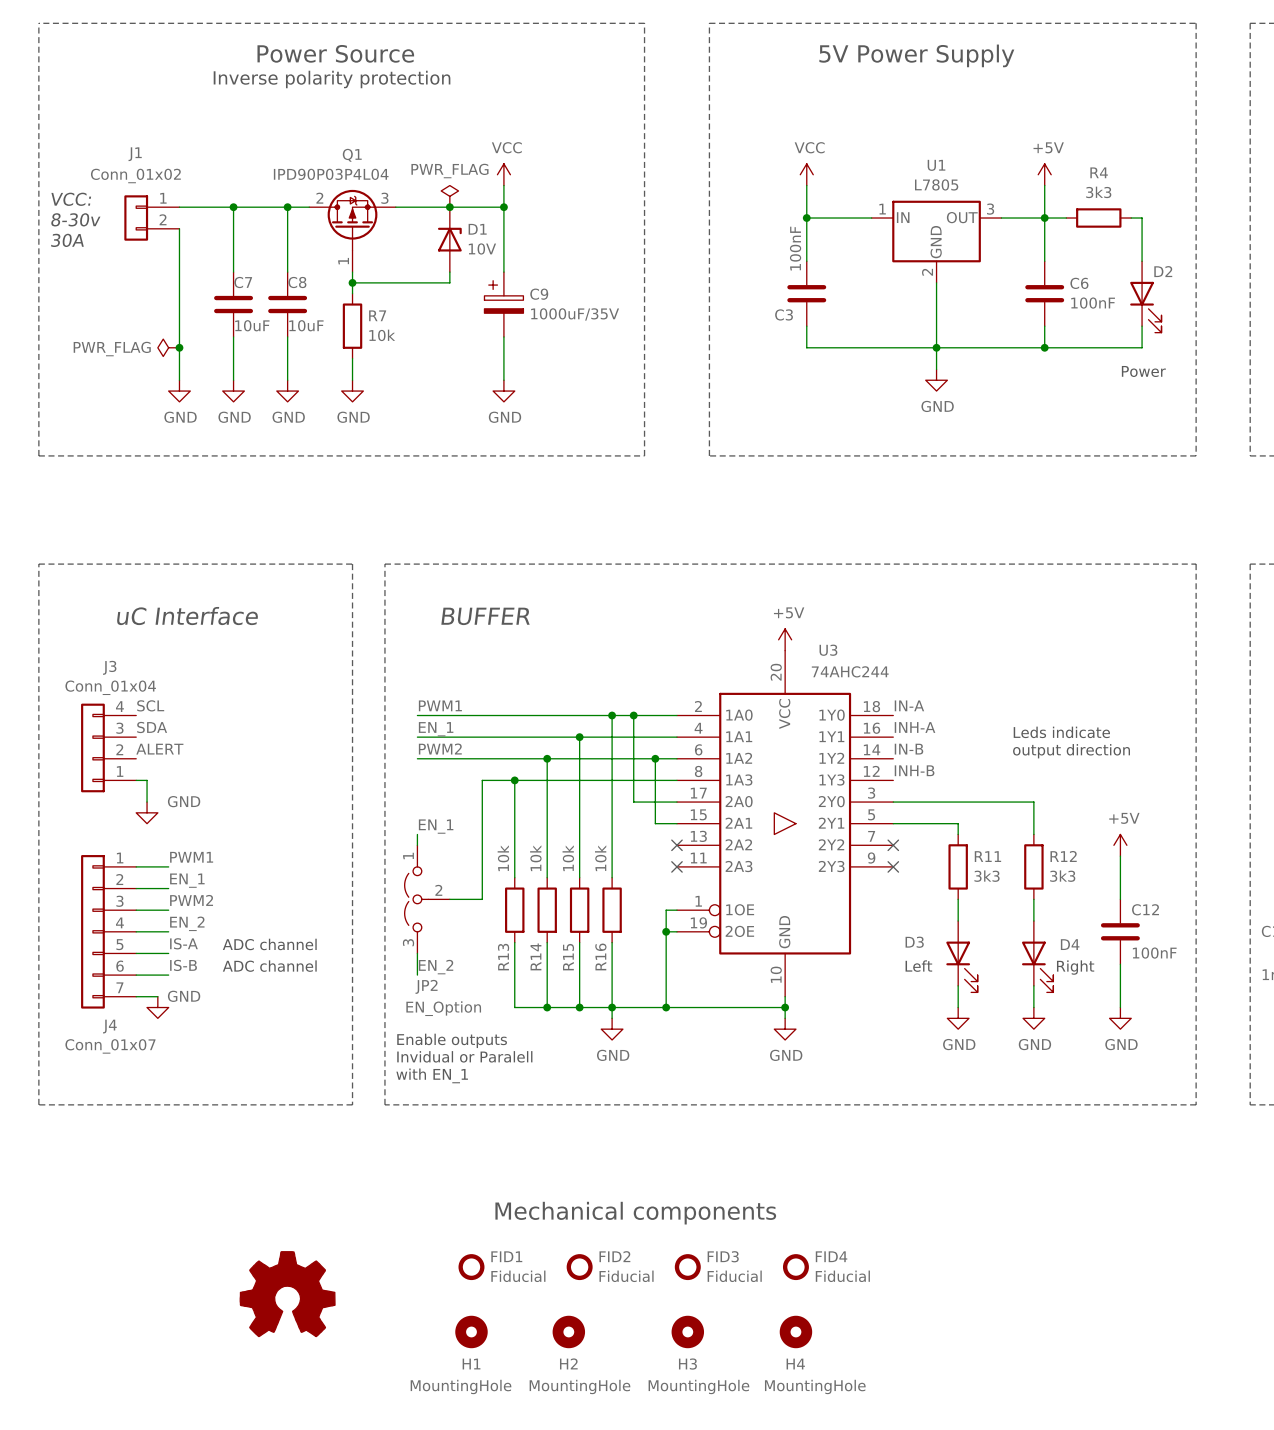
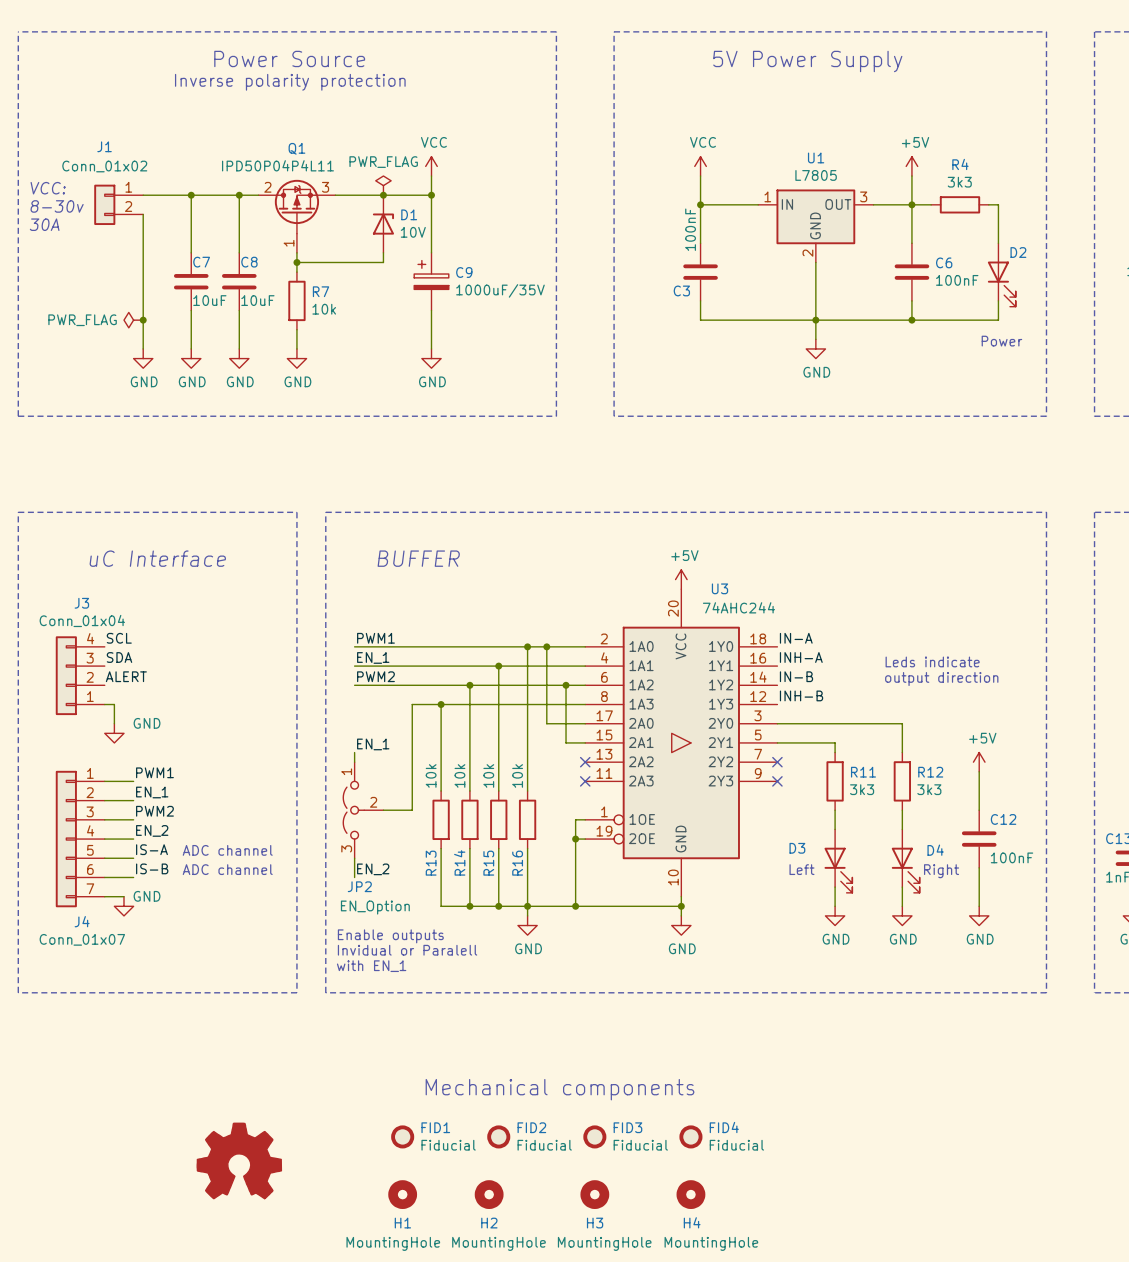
Q1 value: IPD90P03P4L04 (331, 174) -> IPD50P04P4L11 (277, 165)

